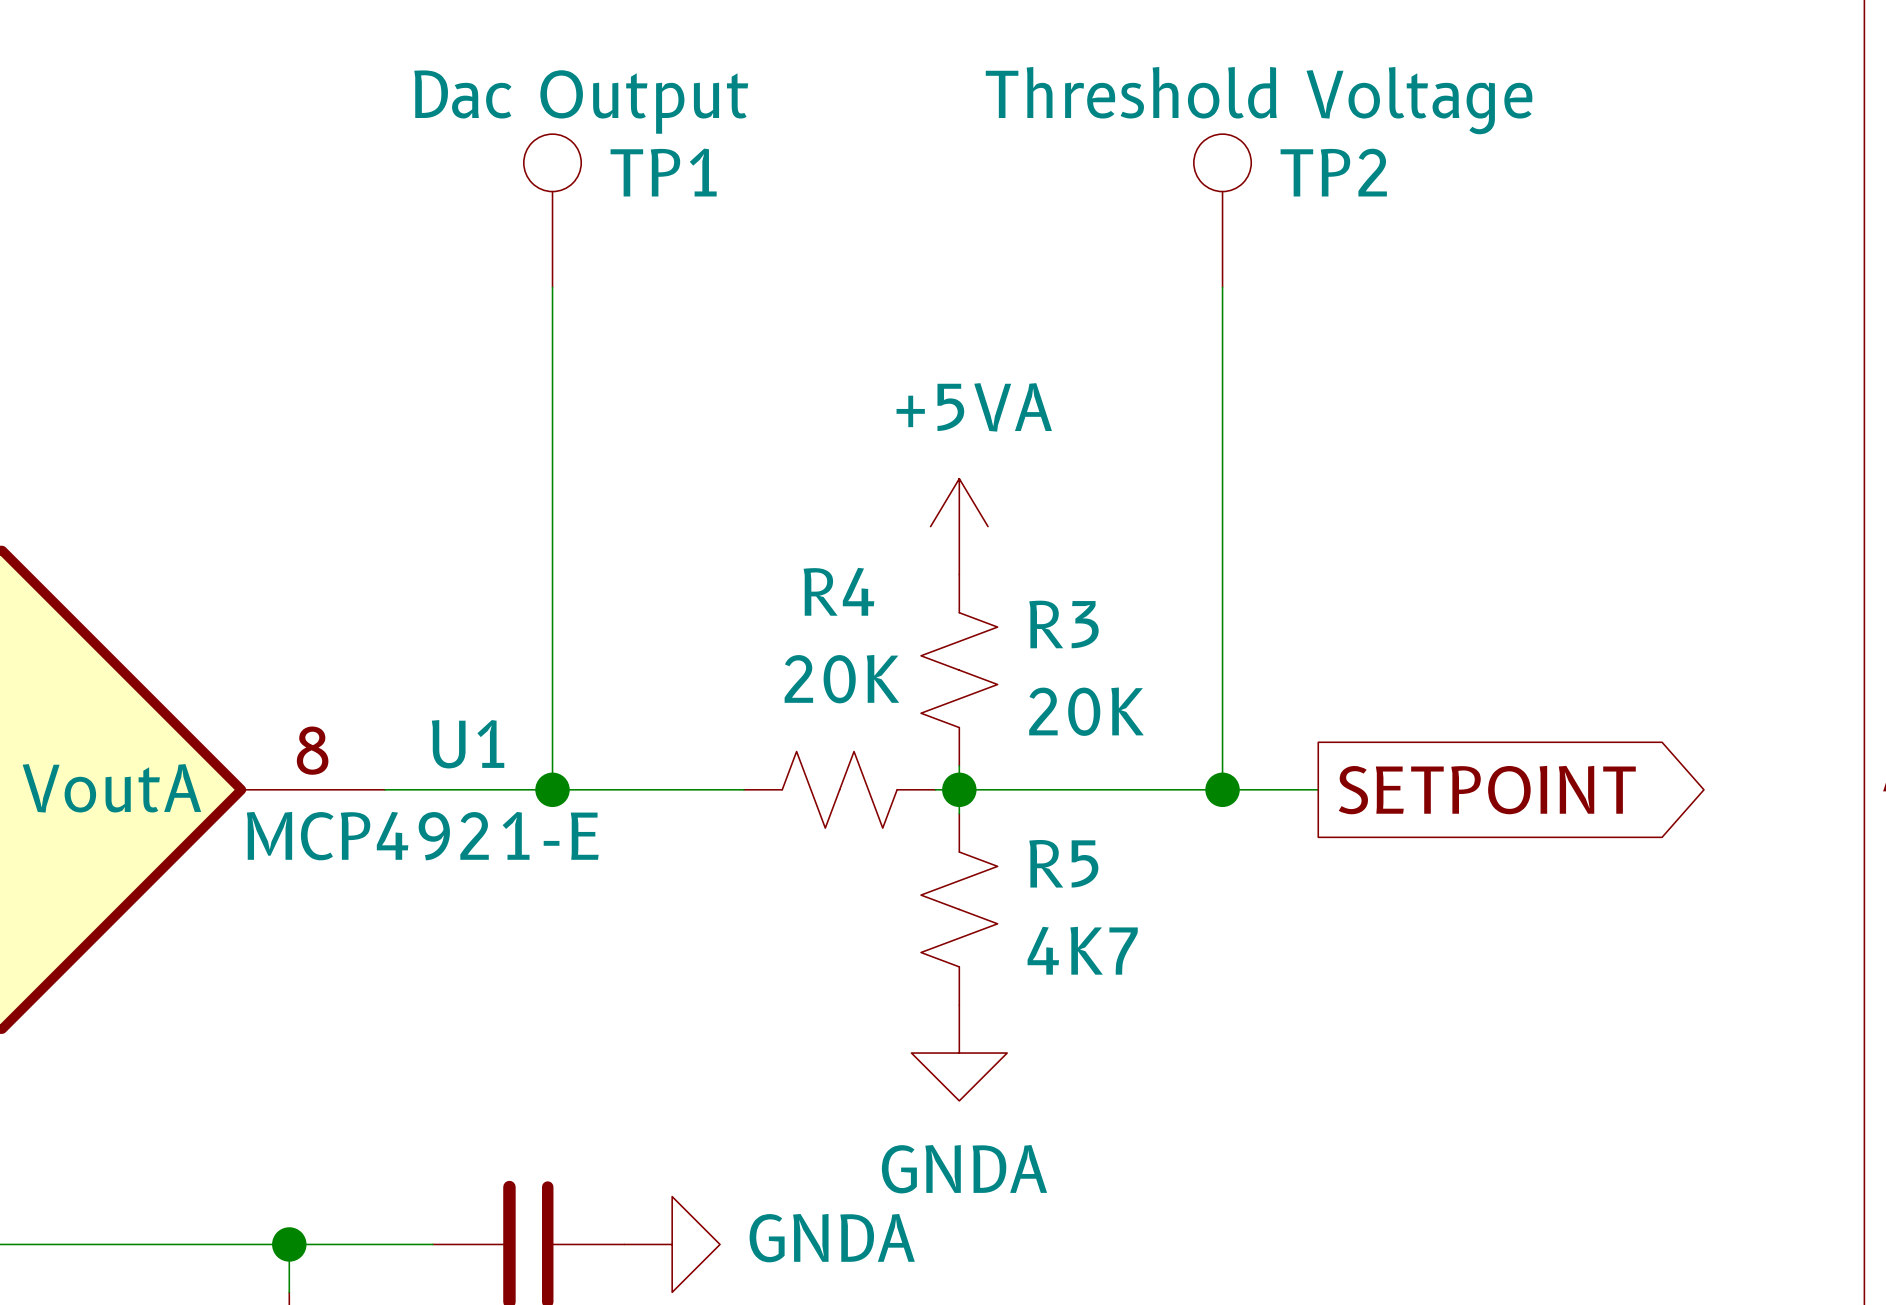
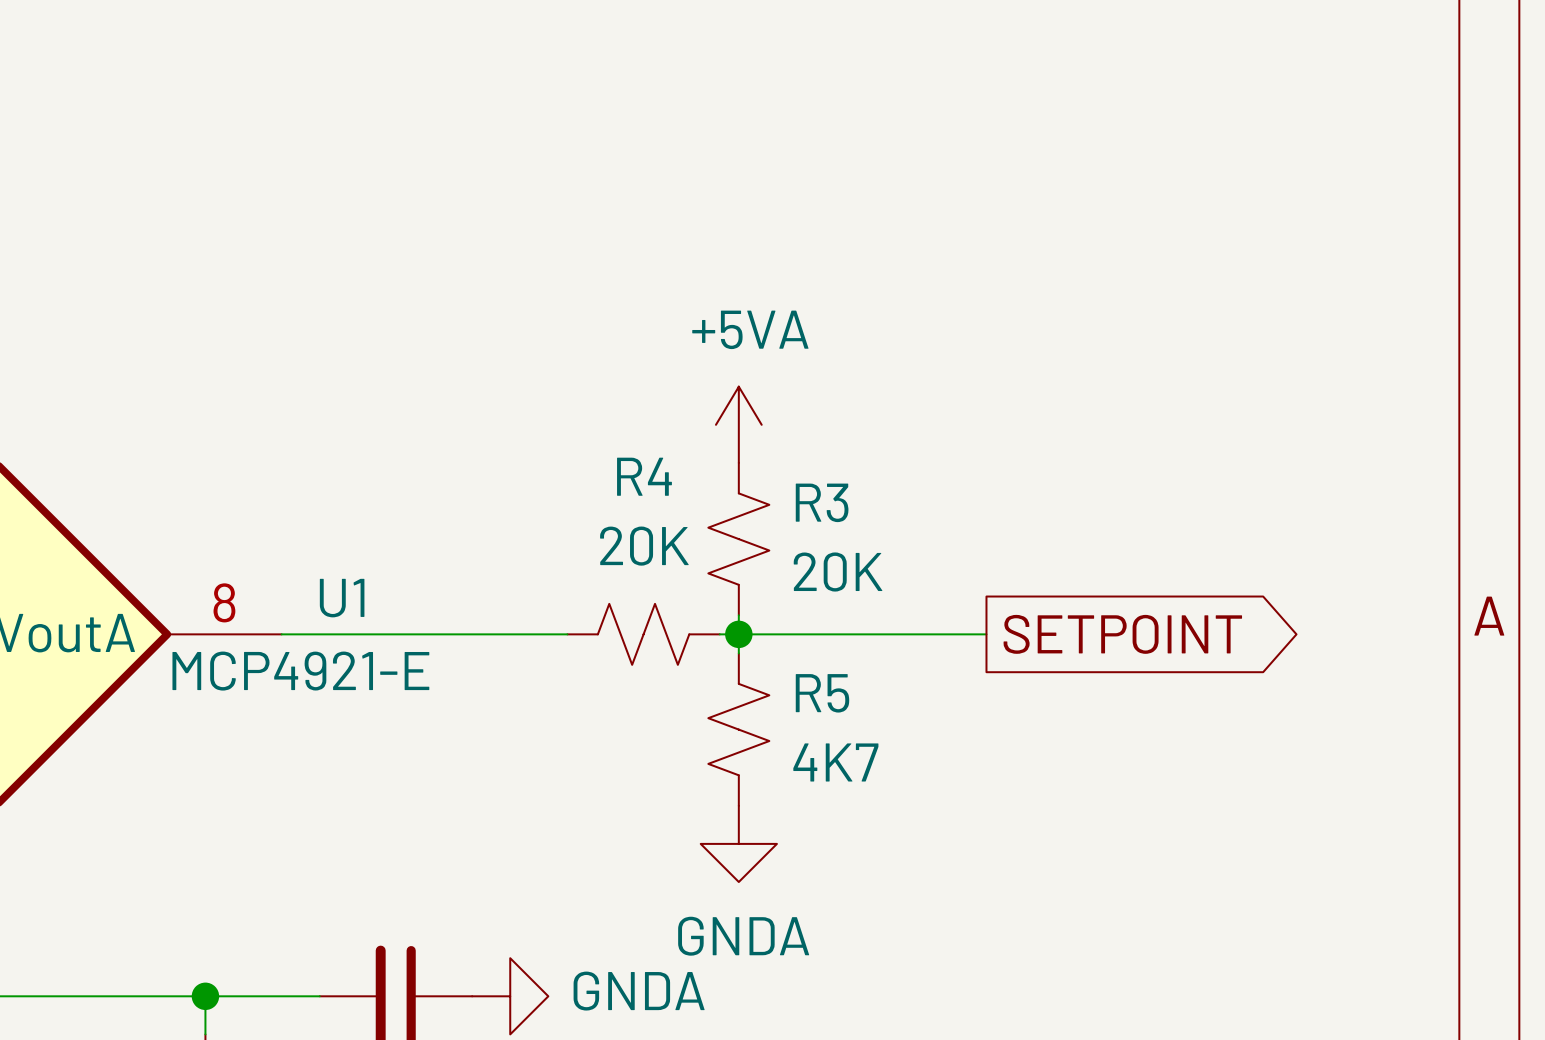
TP1: Dac Output (552, 210) -> none
TP2: Threshold Voltage (1222, 210) -> none
wire: (552, 287) (552, 789) -> none
wire: (1222, 287) (1222, 789) -> none
junction: (552, 789) -> none
junction: (1222, 789) -> none
wire: (1270, 789) (1318, 789) -> none
global label position: SETPOINT (1487, 790) -> SETPOINT (1122, 634)

